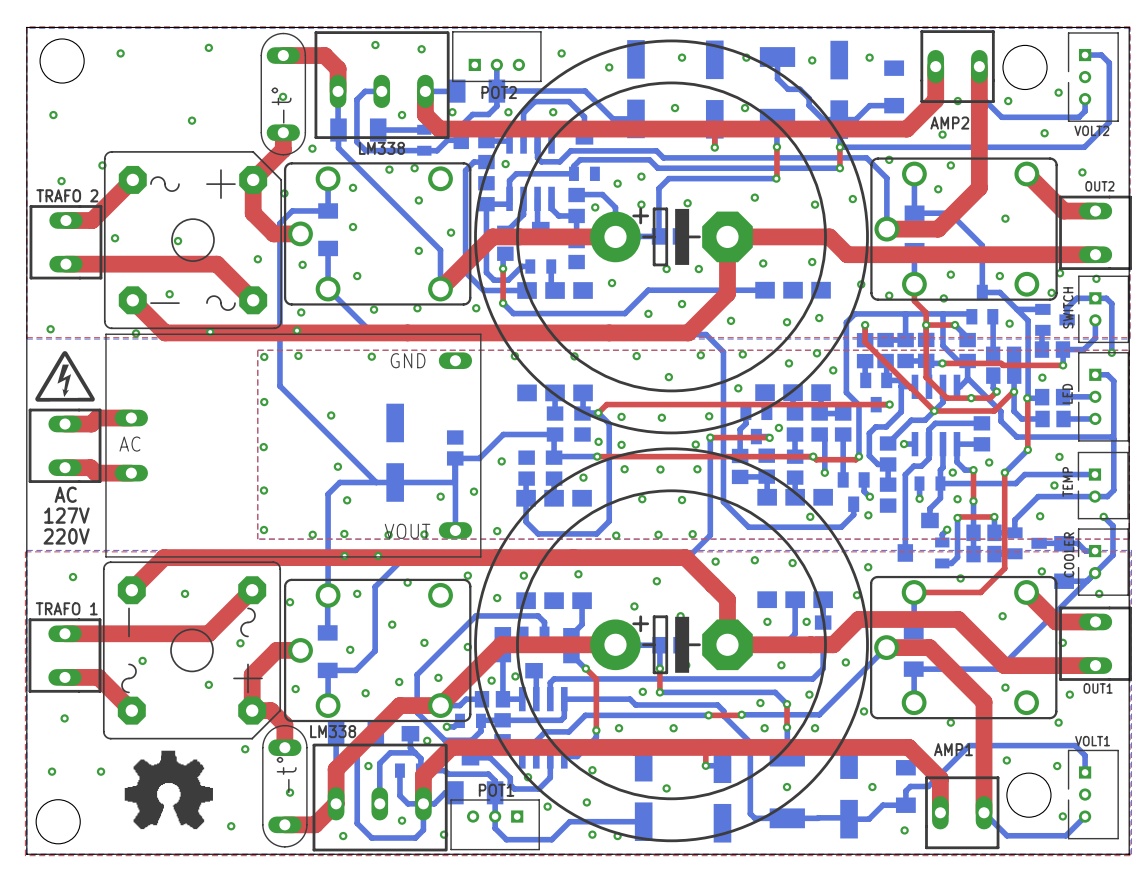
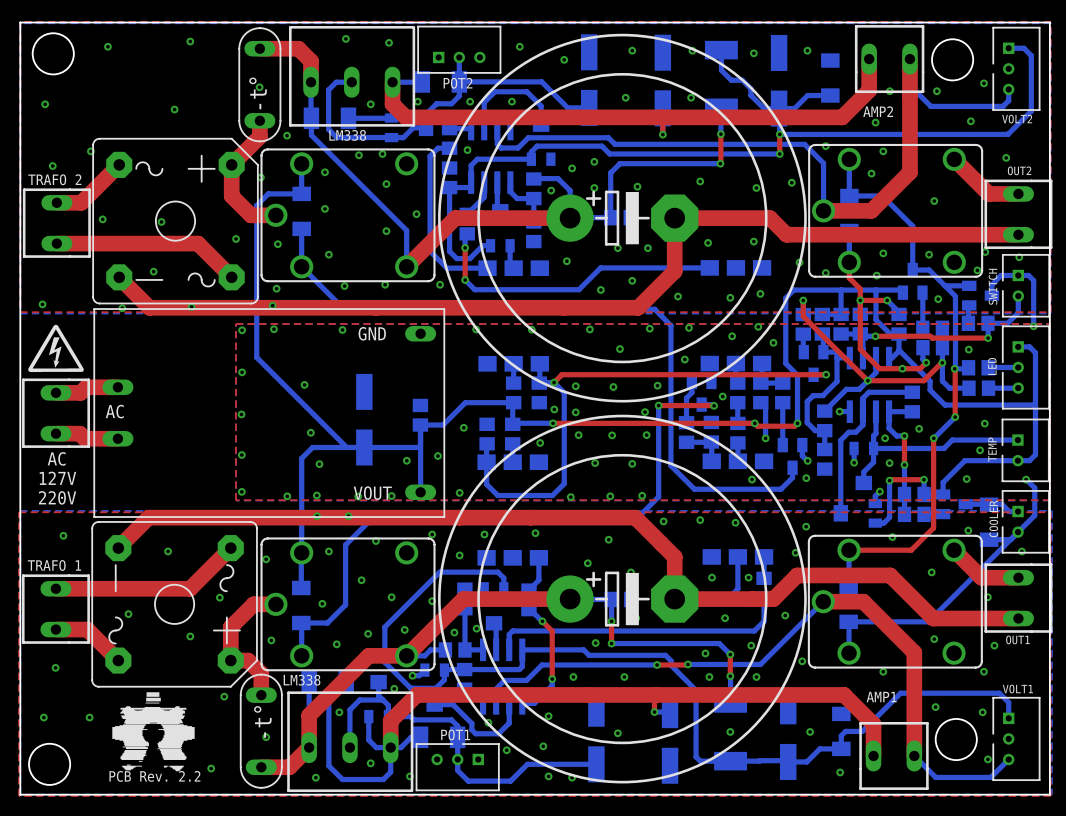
drawing: none -> [112, 692, 195, 766]
drawing: [124, 750, 213, 830] -> none
text: none -> PCB Rev. 2.2 (154, 776)

